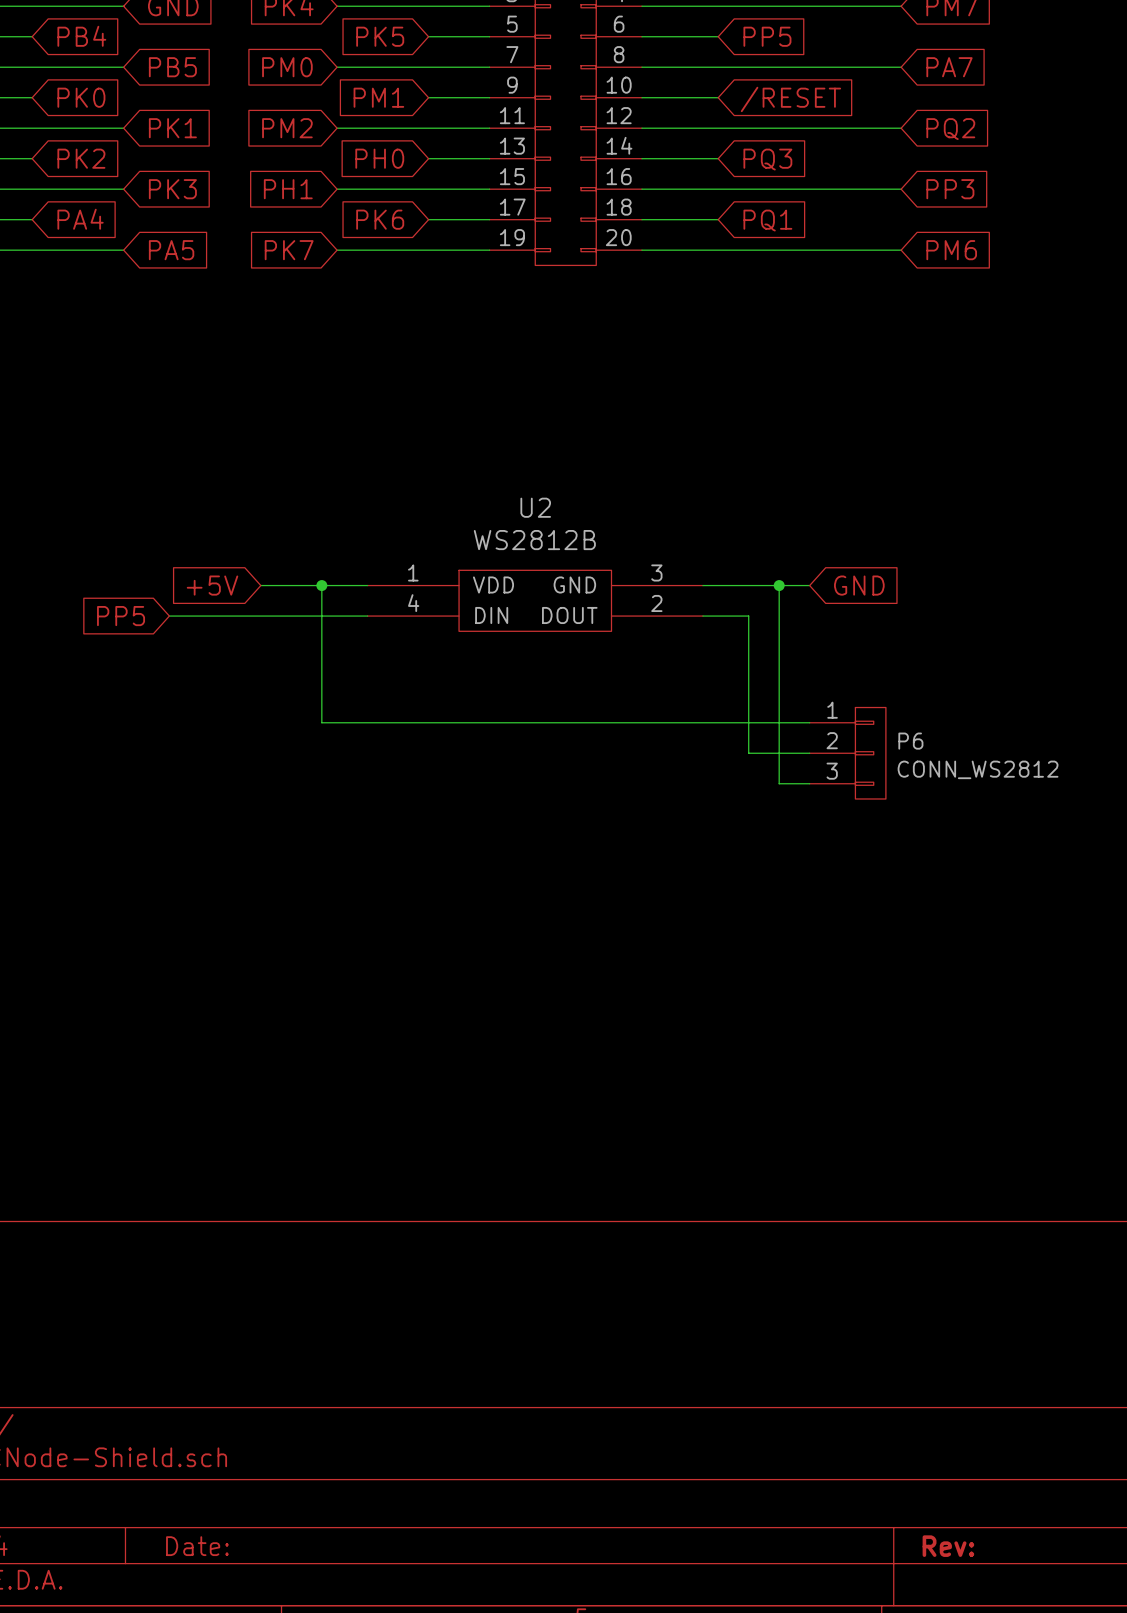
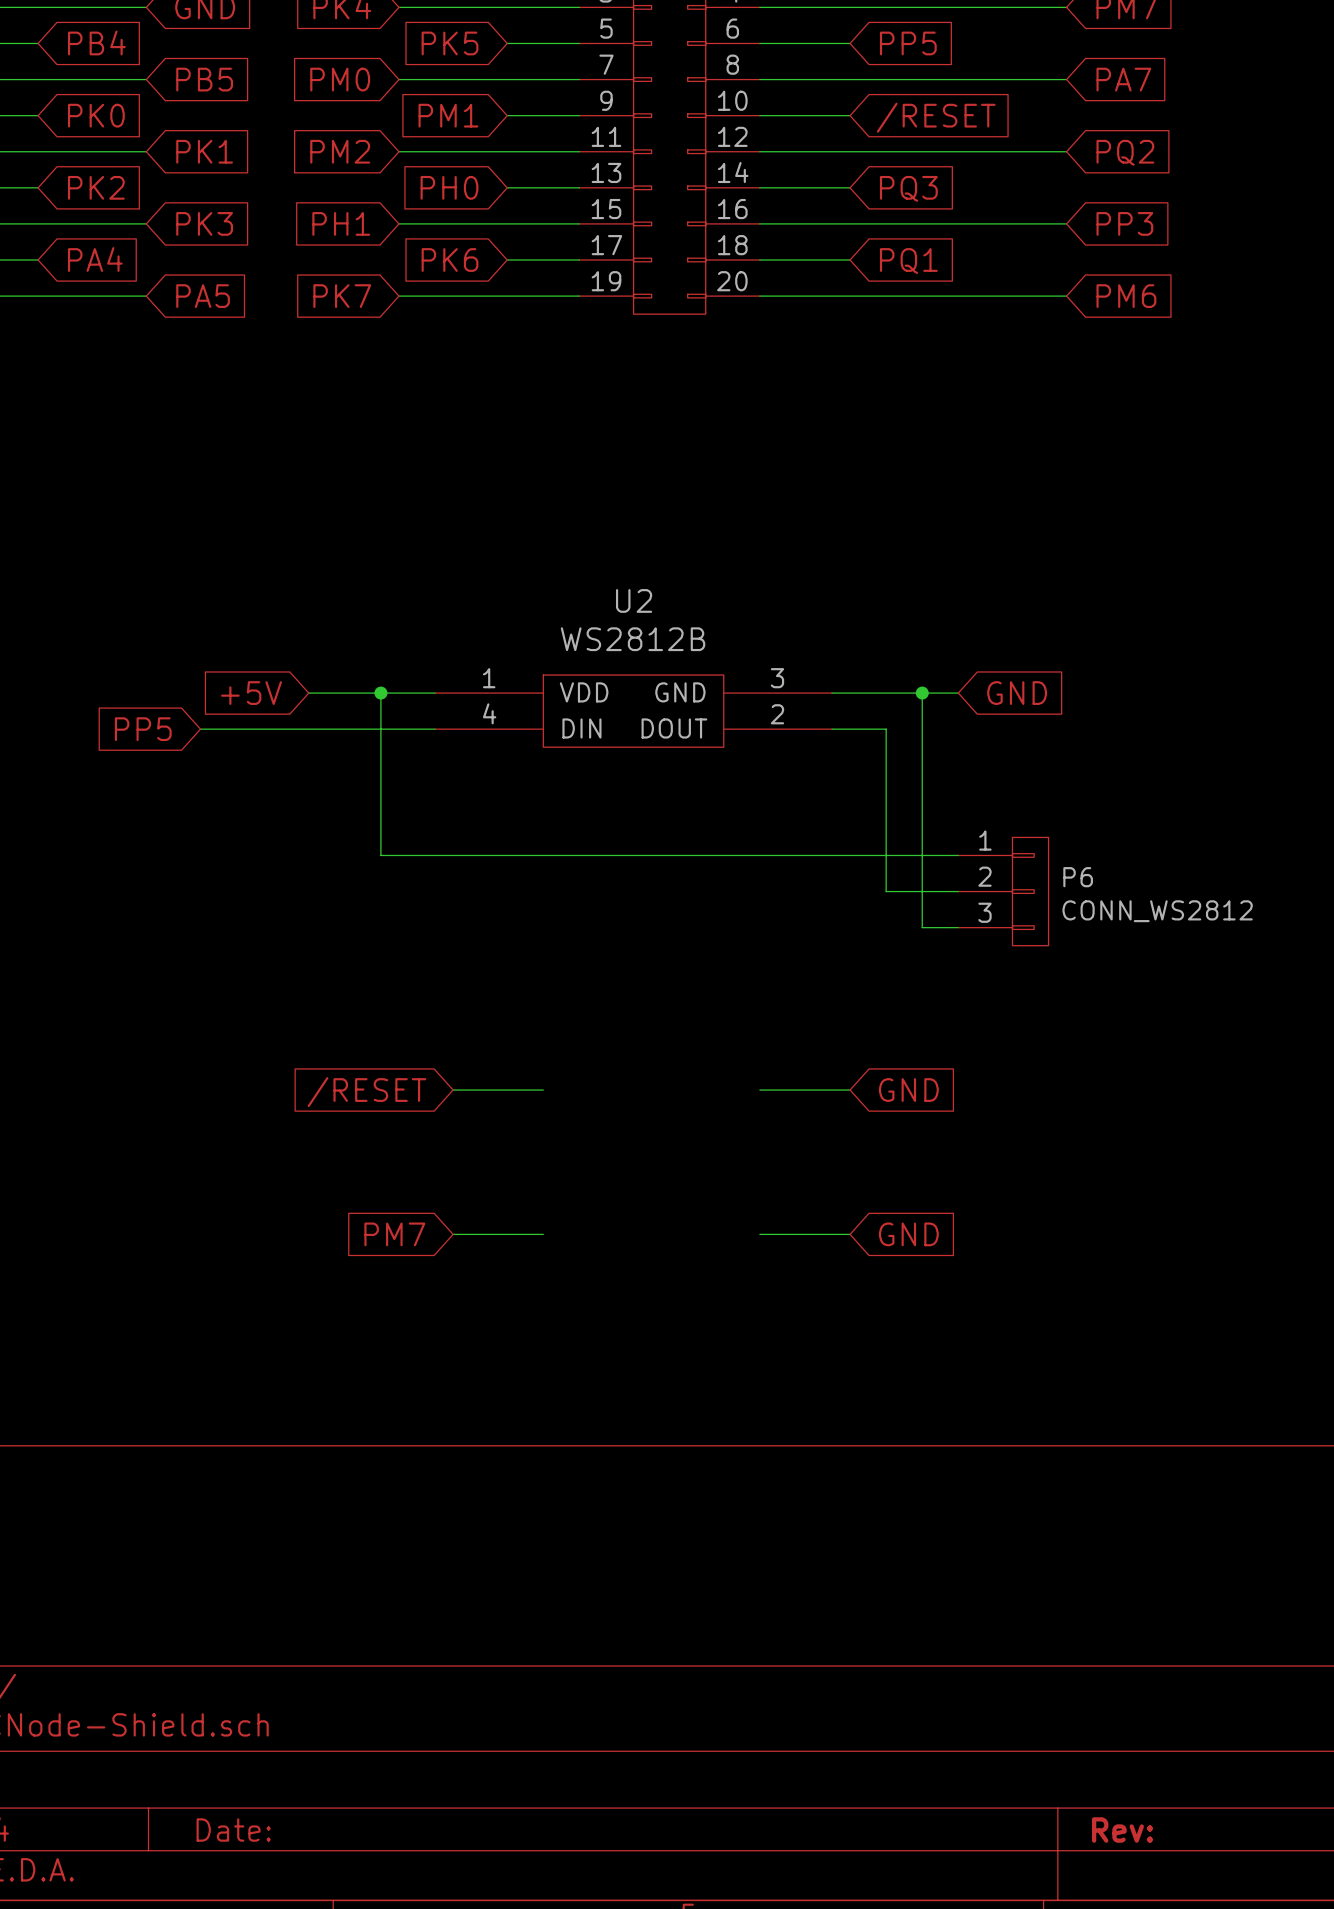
wire: none -> (453, 1090) (543, 1090)
wire: none -> (759, 1090) (850, 1090)
global label: none -> GND (908, 1090)
global label: none -> /RESET (367, 1092)
global label: none -> PM7 (394, 1234)
wire: none -> (453, 1234) (543, 1234)
wire: none -> (759, 1234) (850, 1234)
global label: none -> GND (908, 1234)

